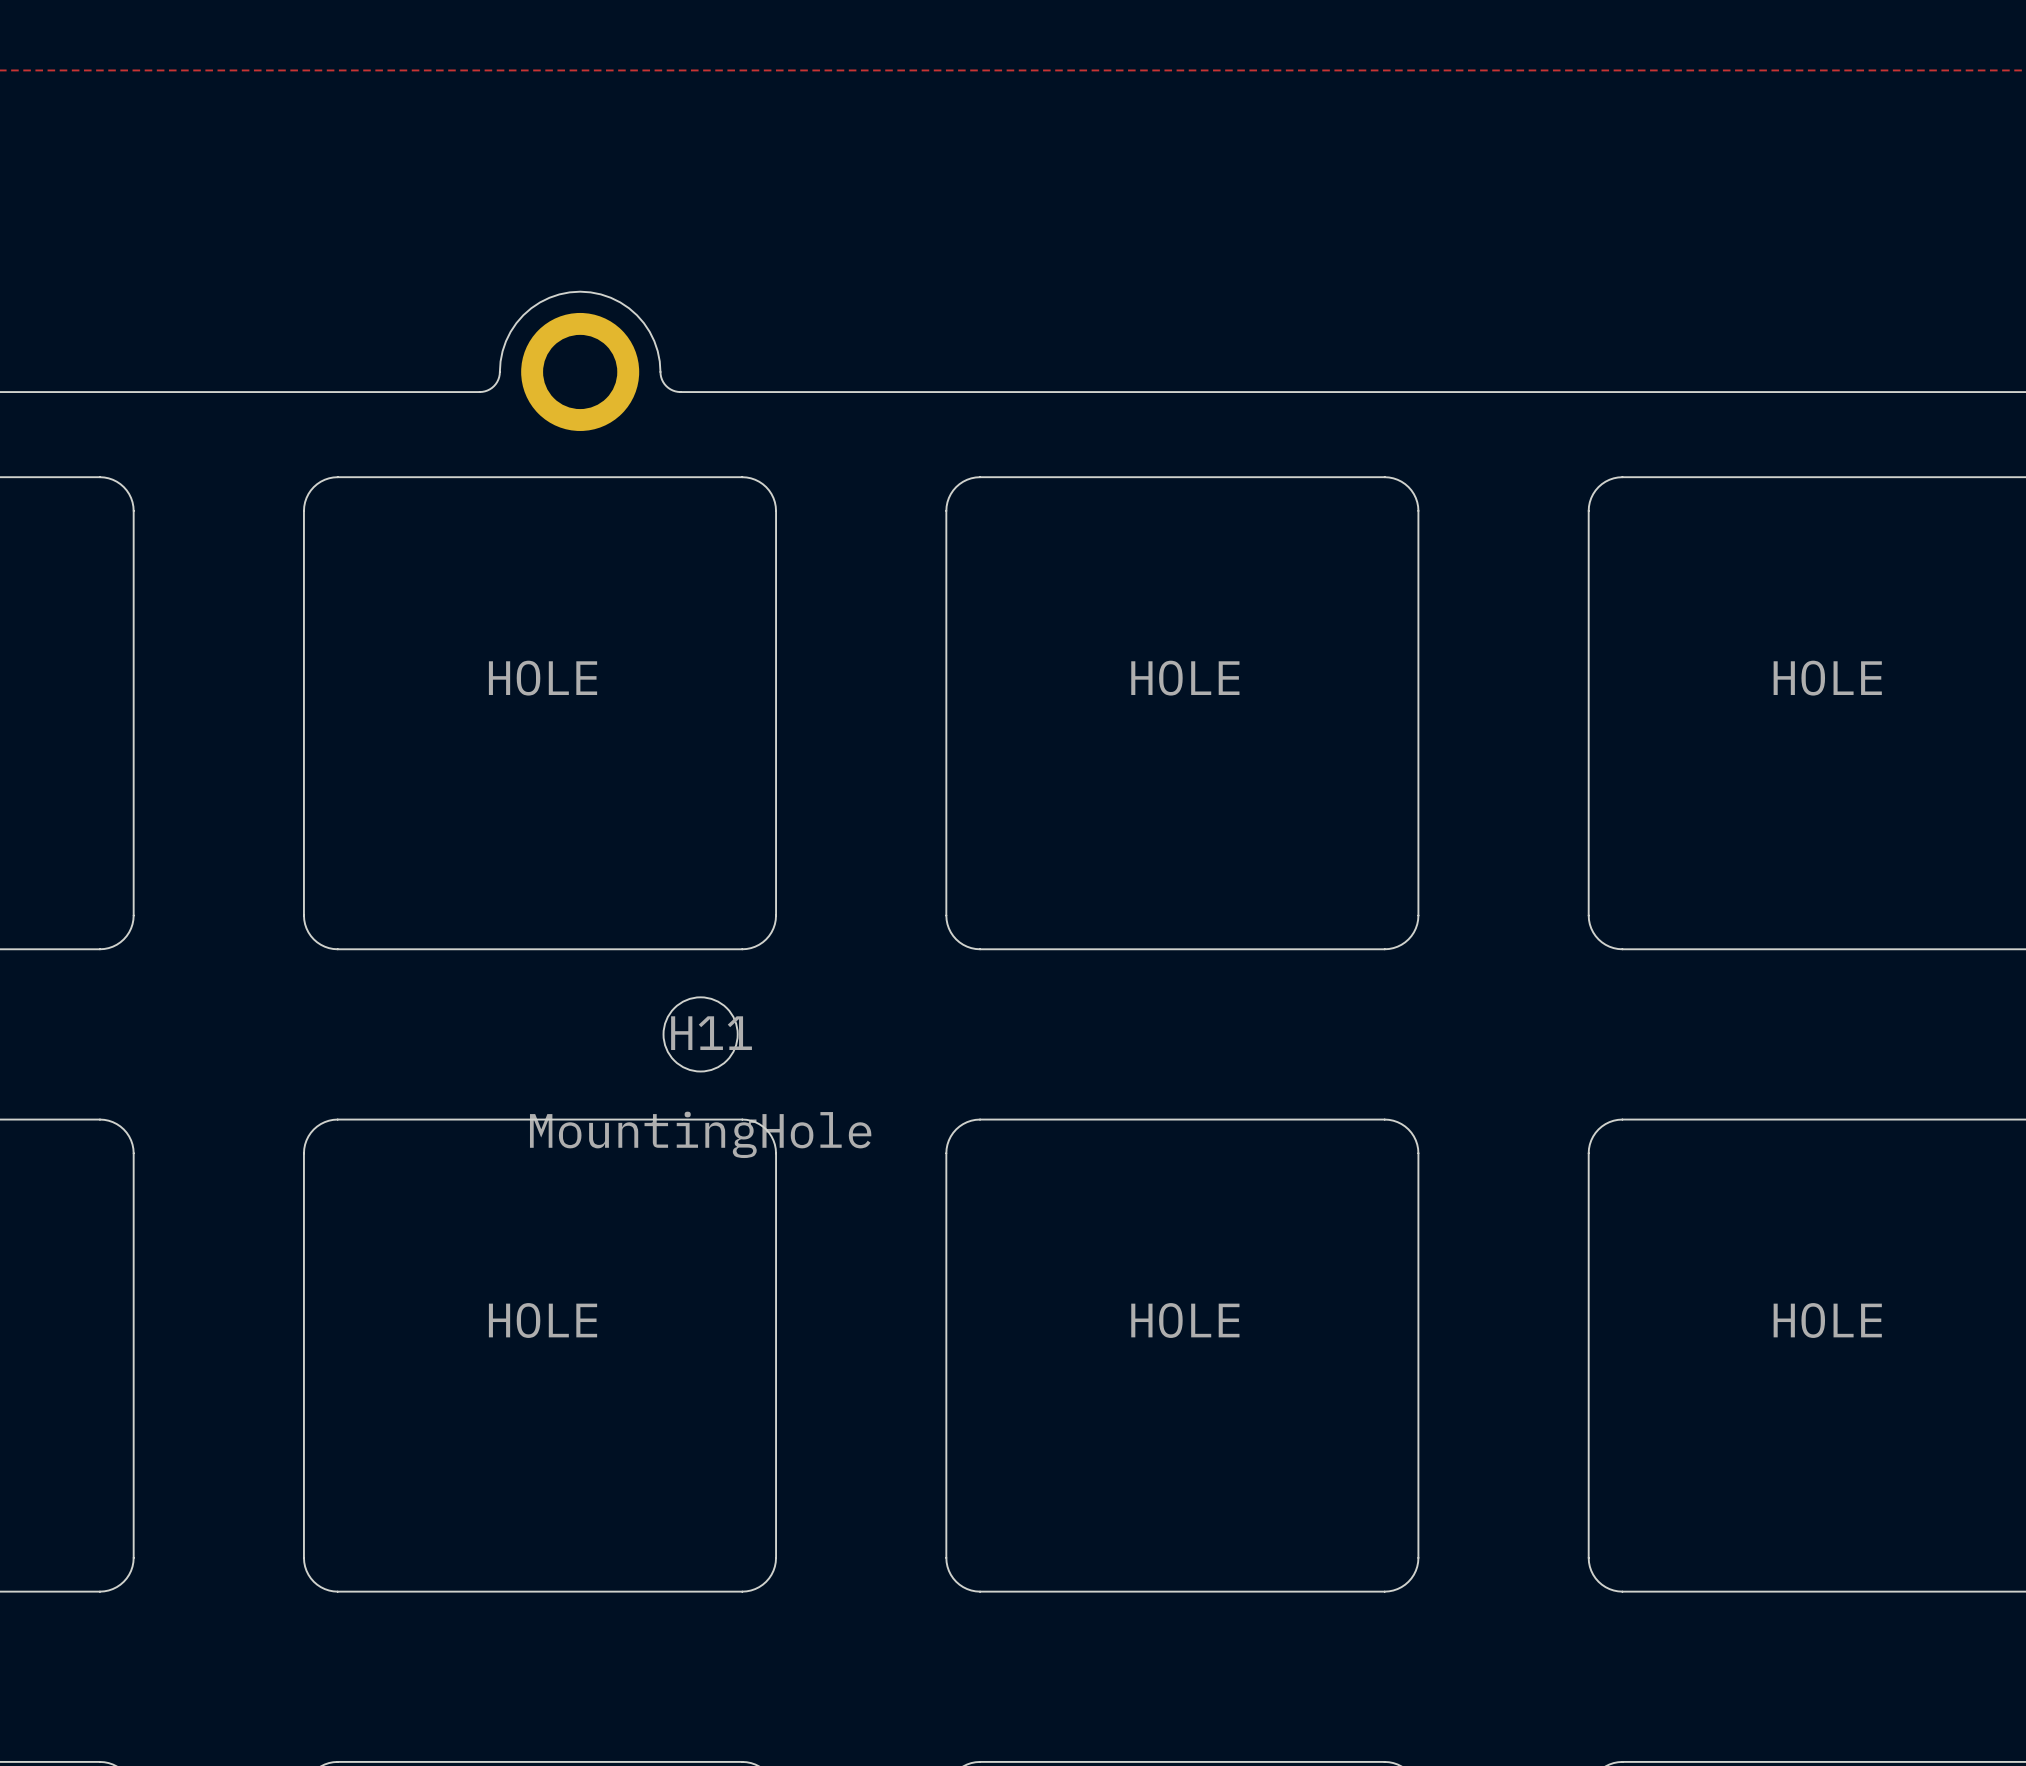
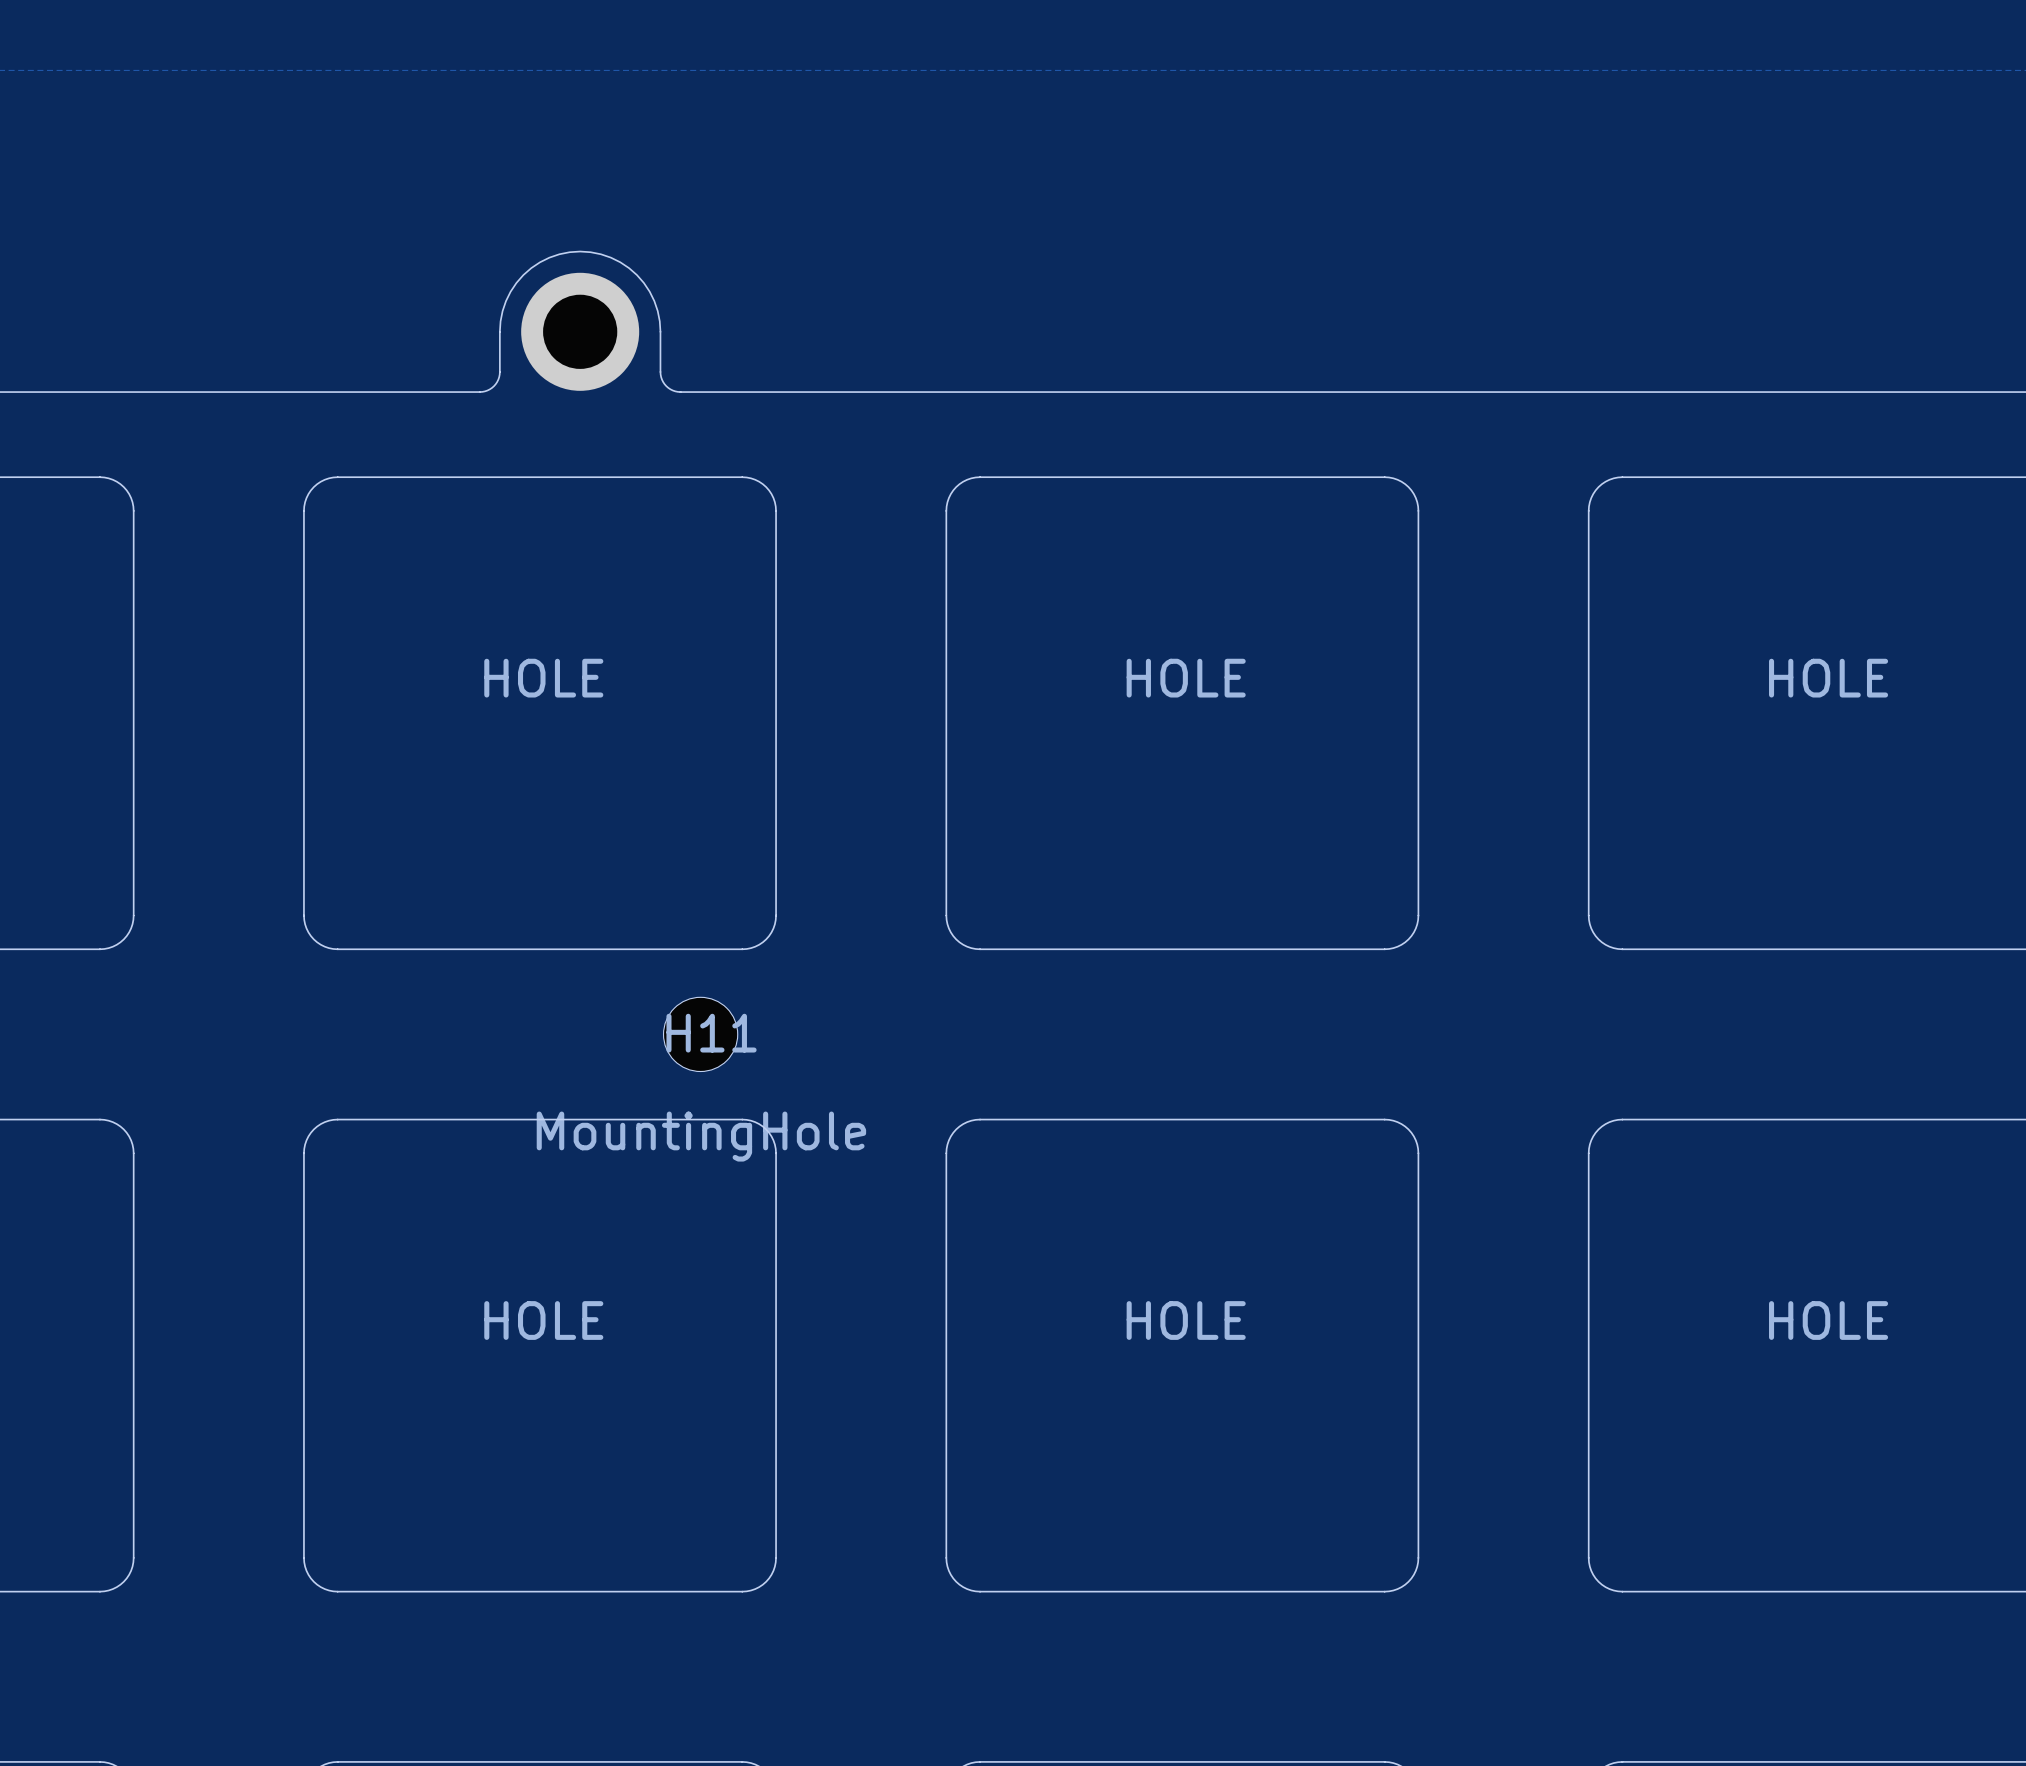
board edge: (499, 371) (505, 341) (523, 315) (549, 297) (580, 291) (610, 297) (636, 315) (654, 341) (660, 371) -> (499, 371) (500, 321) (510, 291) (523, 275) (540, 262) (559, 254) (580, 251) (600, 254) (620, 262) (636, 275) (649, 291) (659, 321) (660, 371)
part position: (580, 371) -> (580, 331)

